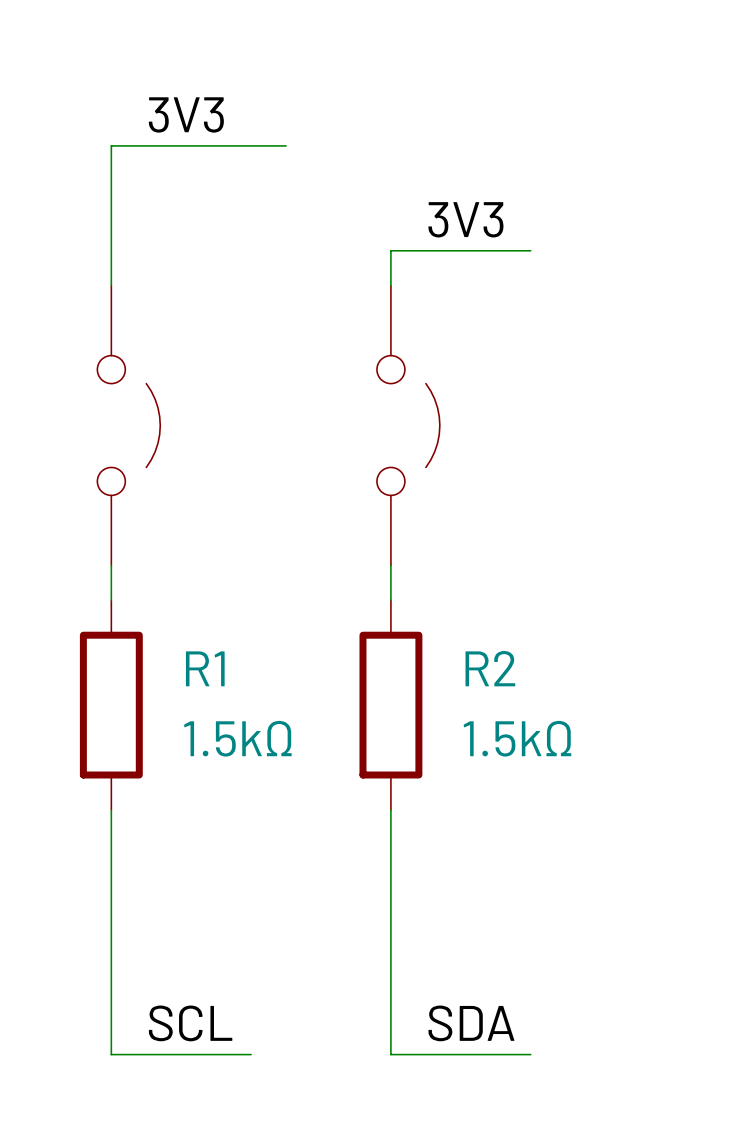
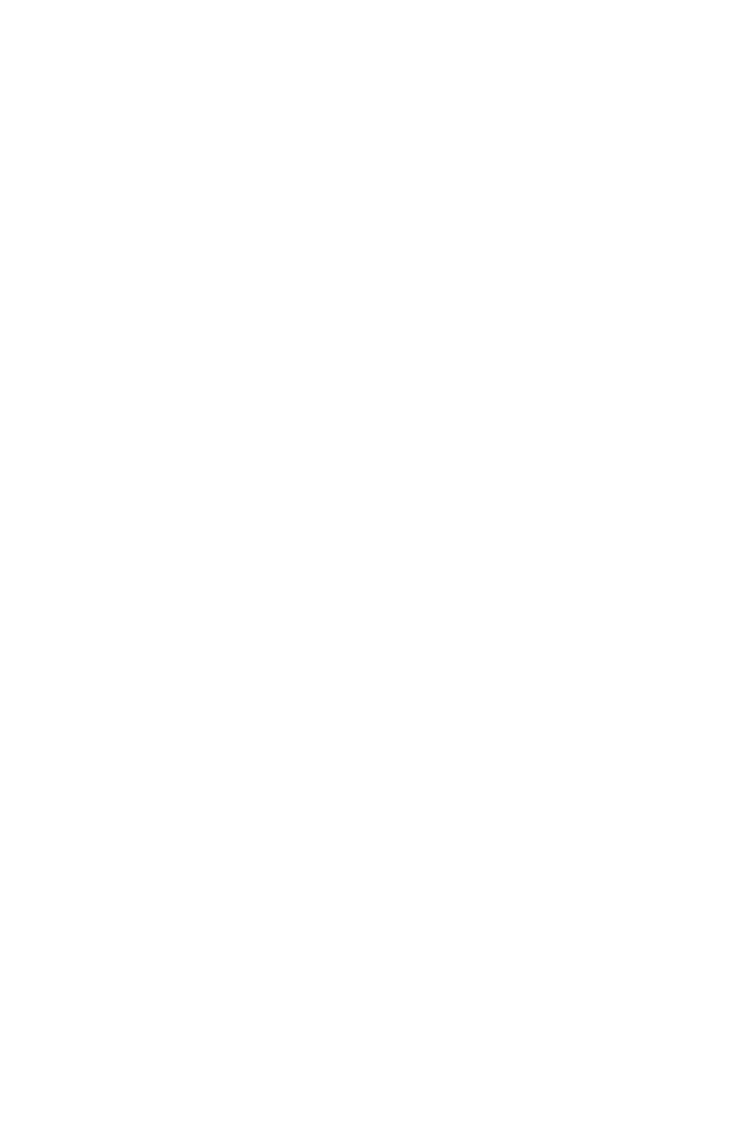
label: 3V3 (186, 114) -> none
wire: (286, 145) (111, 145) (111, 285) -> none
label: 3V3 (465, 219) -> none
wire: (530, 250) (390, 250) (390, 285) -> none
part: (128, 425) -> none
part: (408, 425) -> none
wire: (111, 565) (111, 600) -> none
wire: (390, 565) (390, 600) -> none
R1: 1.5kΩ (111, 705) -> none
R2: 1.5kΩ (390, 705) -> none
wire: (111, 809) (111, 1054) (251, 1054) -> none
wire: (390, 809) (390, 1054) (530, 1054) -> none
label: SCL (190, 1023) -> none
label: SDA (471, 1023) -> none

